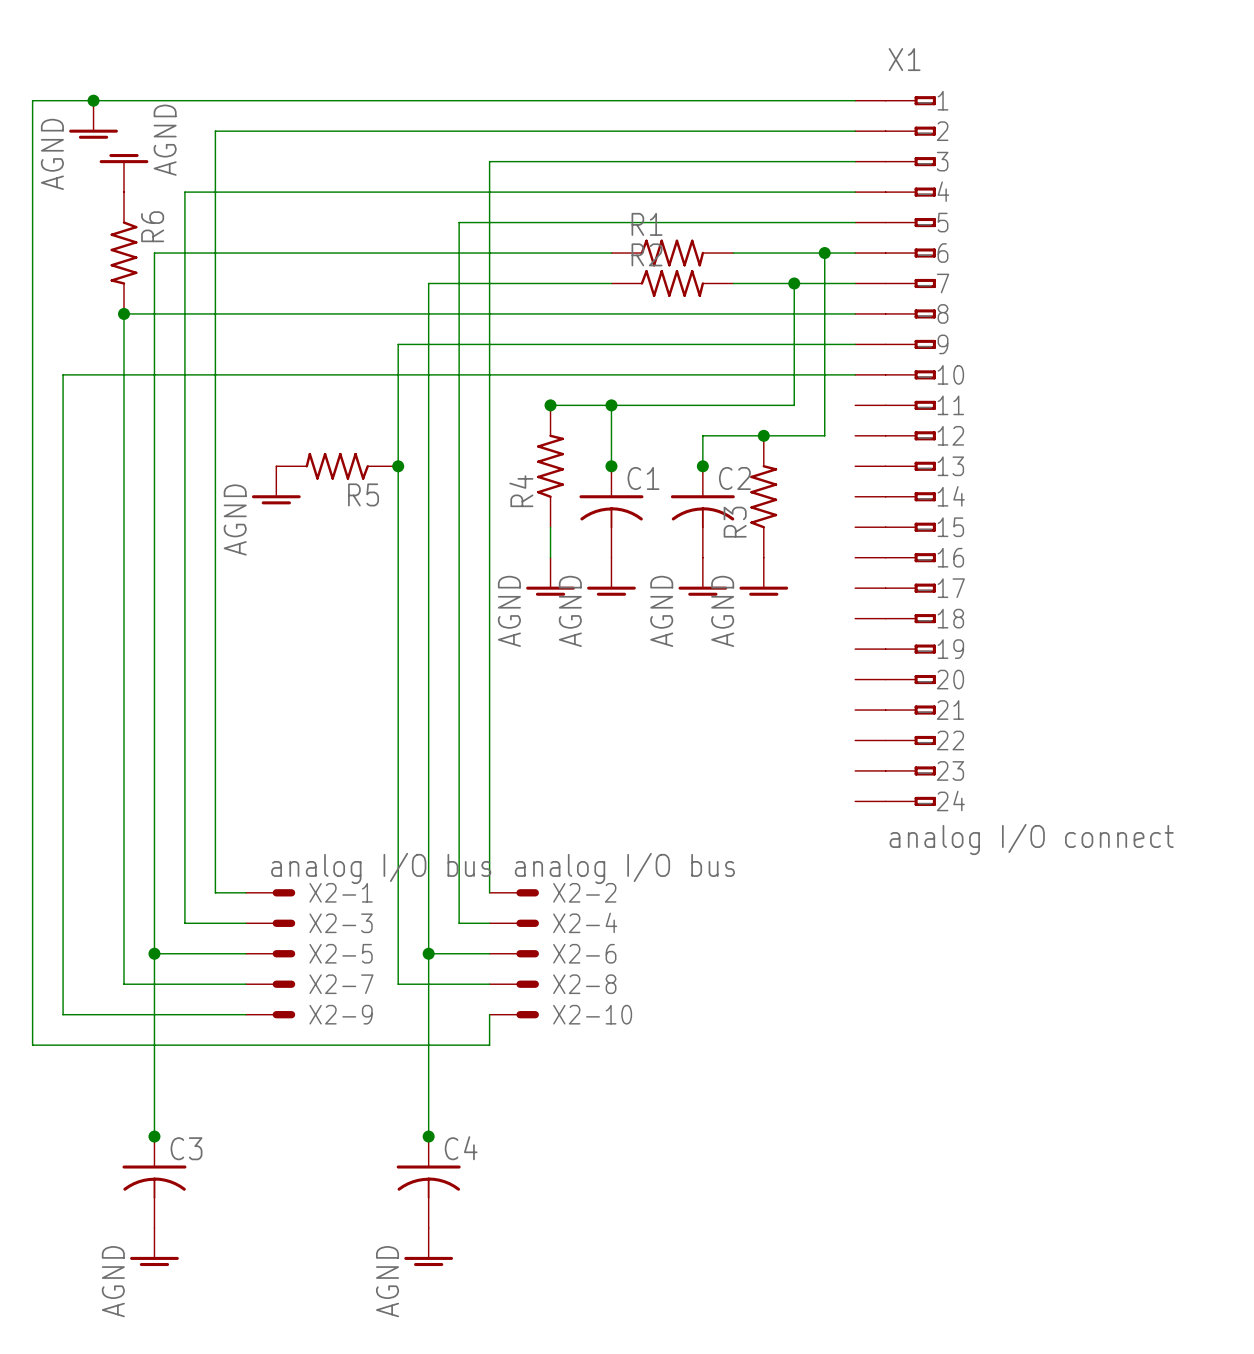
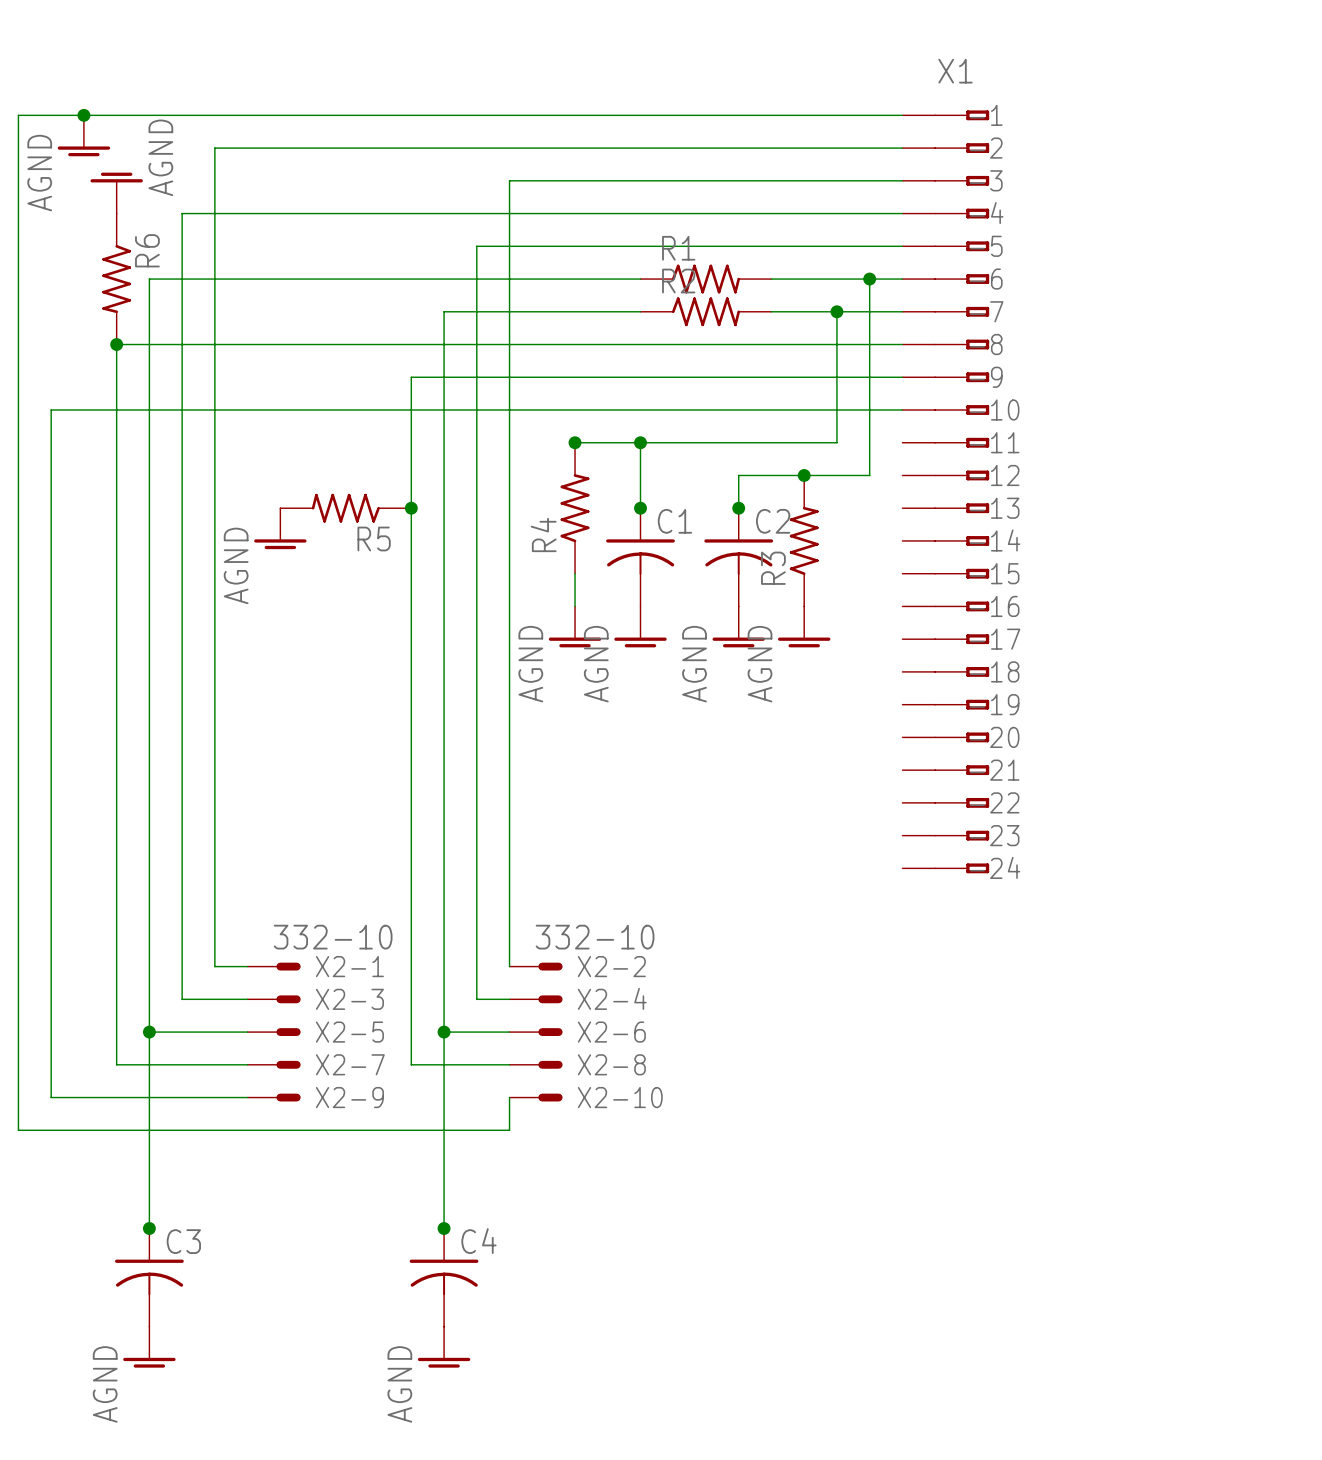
X1 value: analog I/O connect (1031, 839) -> none
X2-1 value: analog I/O bus (381, 868) -> 332-10 (333, 937)
X2-2 value: analog I/O bus (624, 868) -> 332-10 (595, 937)

